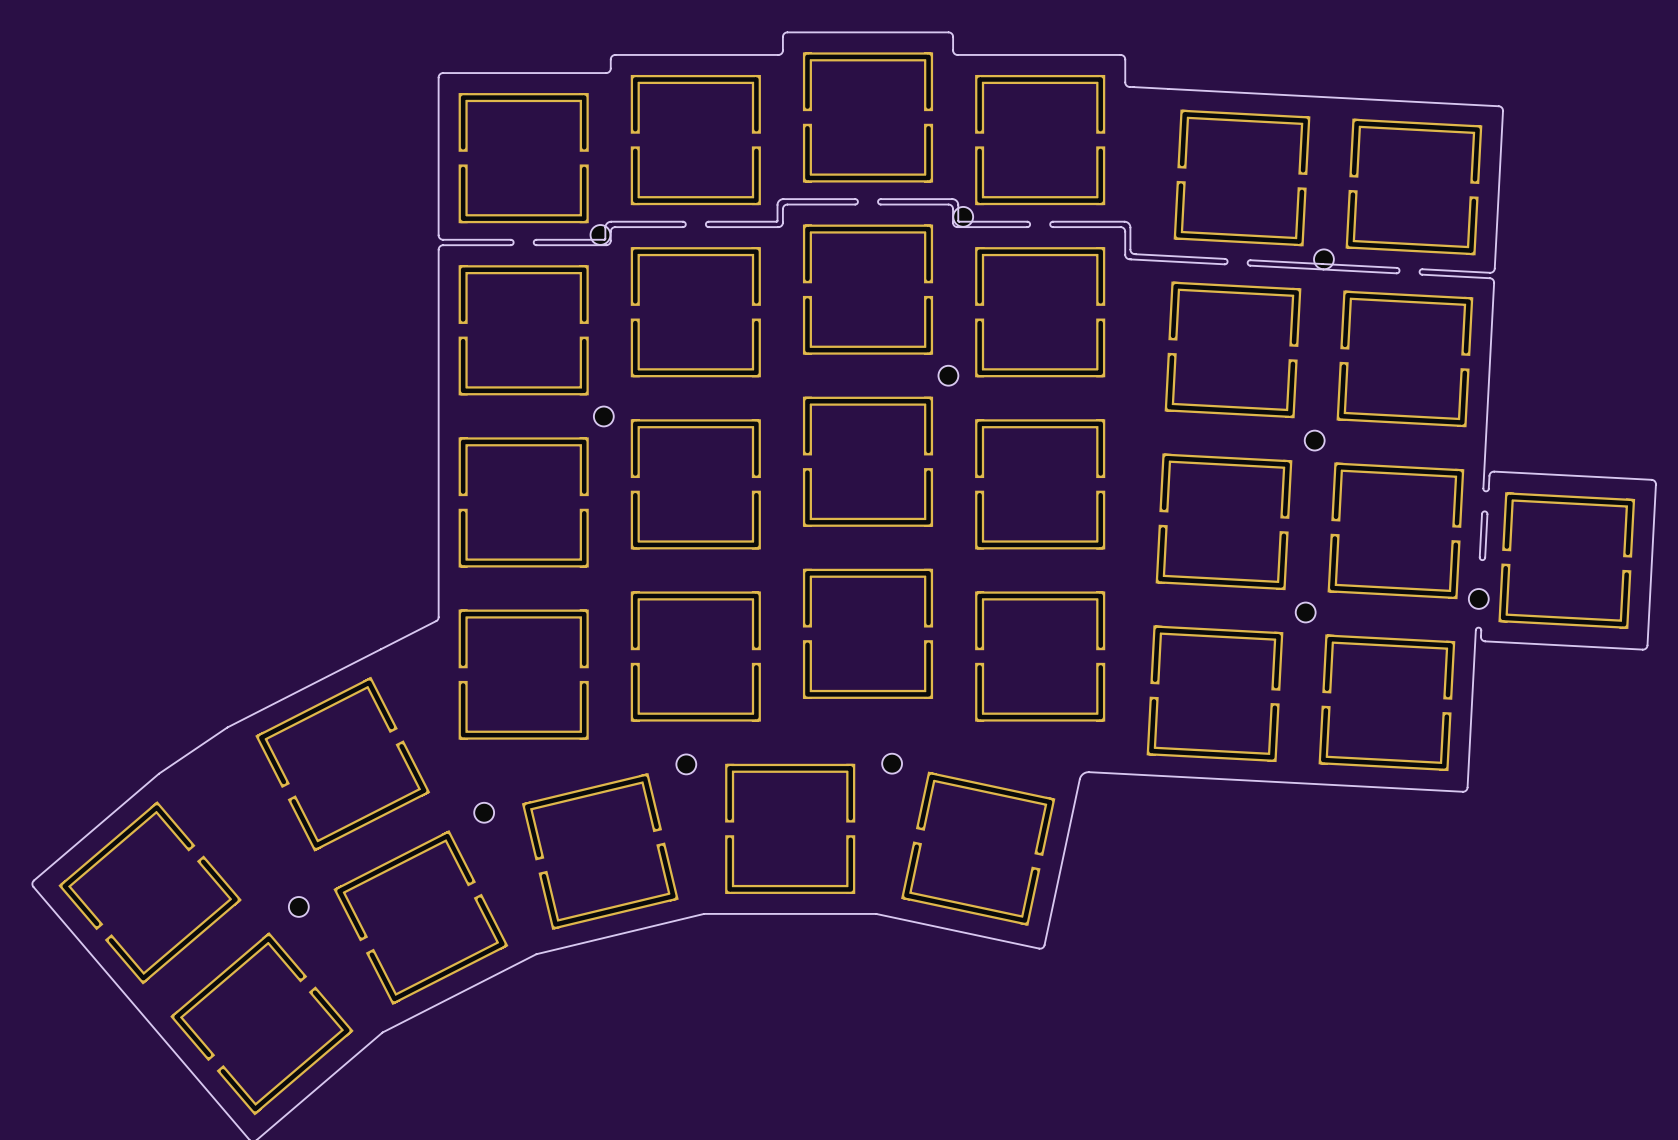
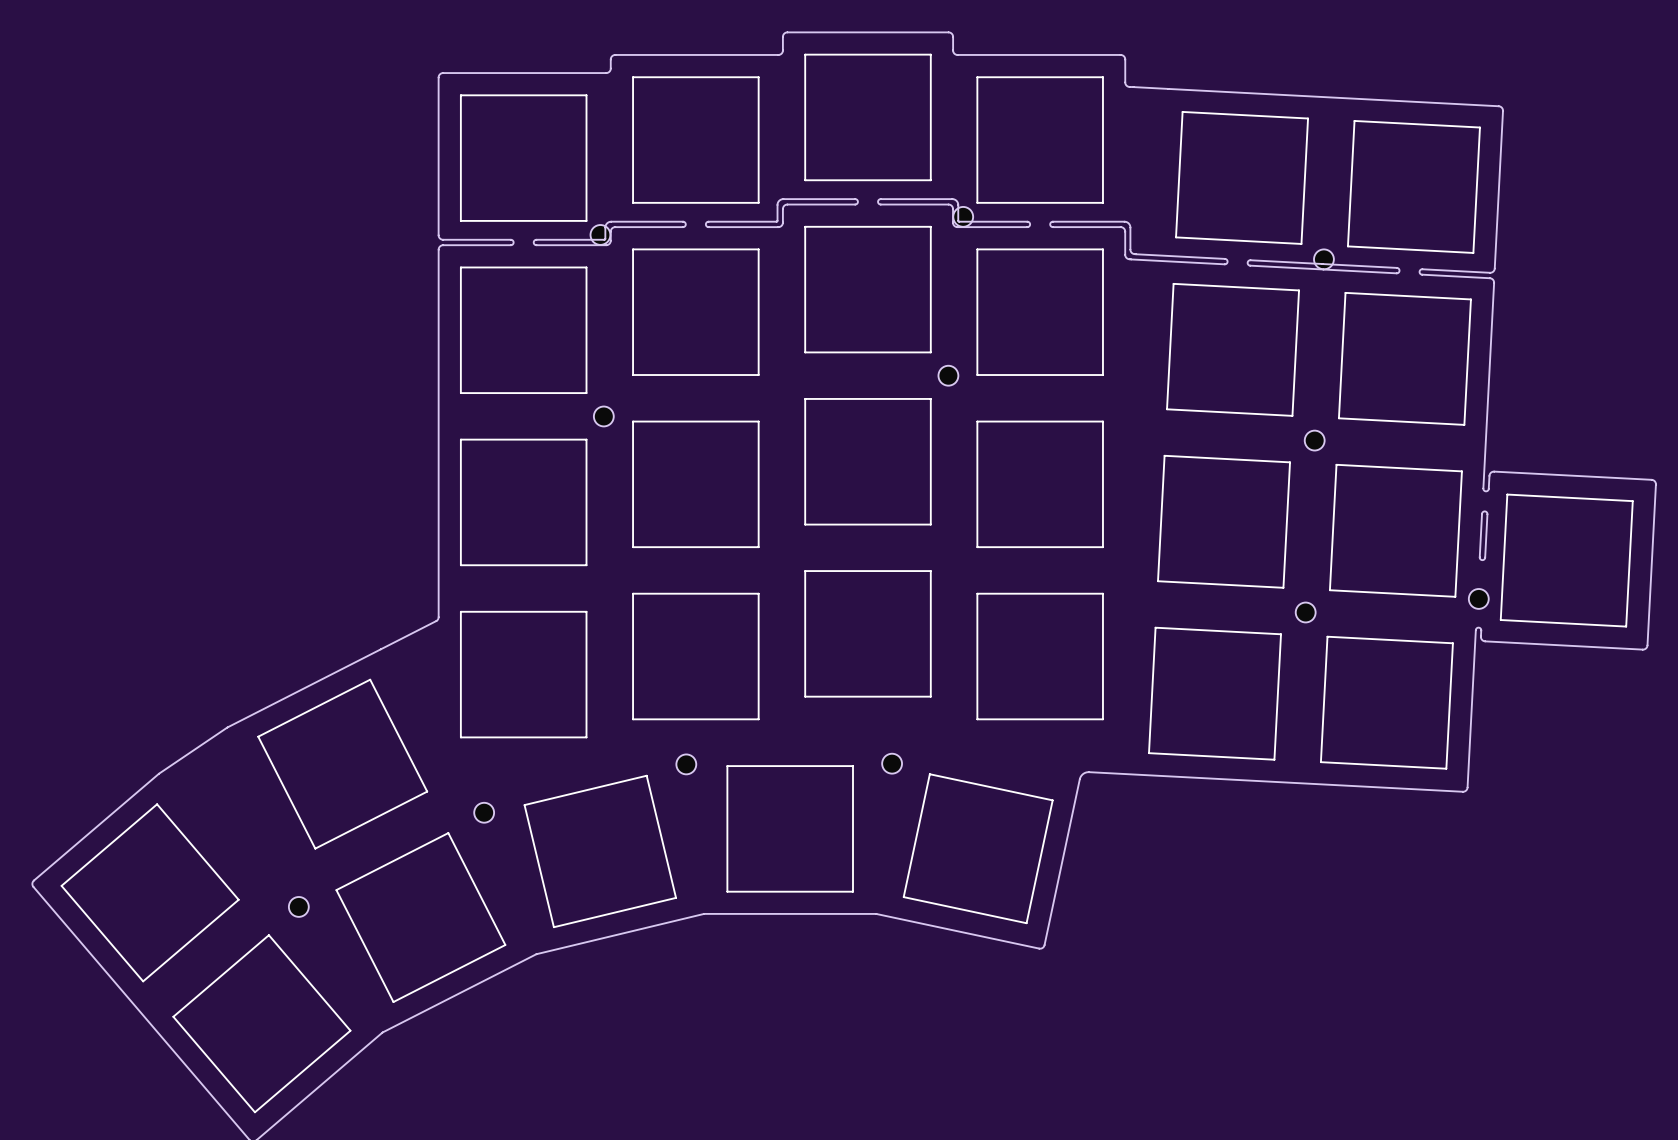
drawing: none -> [804, 54, 932, 181]
drawing: none -> [632, 76, 760, 204]
drawing: none -> [976, 76, 1104, 204]
drawing: none -> [460, 94, 588, 222]
drawing: none -> [1175, 111, 1309, 245]
part: (868, 117) -> none
drawing: none -> [1347, 120, 1481, 254]
part: (695, 140) -> none
part: (1040, 140) -> none
part: (523, 158) -> none
part: (1242, 177) -> none
part: (1413, 186) -> none
drawing: none -> [804, 226, 932, 353]
drawing: none -> [632, 248, 760, 376]
drawing: none -> [976, 248, 1104, 376]
drawing: none -> [460, 266, 588, 394]
drawing: none -> [1166, 283, 1300, 417]
part: (868, 289) -> none
drawing: none -> [1338, 292, 1472, 426]
part: (695, 312) -> none
part: (1040, 312) -> none
part: (523, 330) -> none
part: (1233, 349) -> none
part: (1404, 358) -> none
drawing: none -> [804, 398, 932, 526]
drawing: none -> [632, 421, 760, 548]
drawing: none -> [976, 421, 1104, 548]
drawing: none -> [460, 439, 588, 566]
drawing: none -> [1157, 455, 1291, 589]
part: (868, 461) -> none
drawing: none -> [1329, 464, 1463, 598]
part: (695, 484) -> none
part: (1040, 484) -> none
drawing: none -> [1500, 494, 1634, 628]
part: (523, 502) -> none
part: (1224, 521) -> none
part: (1395, 530) -> none
part: (1566, 560) -> none
drawing: none -> [804, 570, 932, 698]
drawing: none -> [632, 593, 760, 720]
drawing: none -> [976, 593, 1104, 720]
drawing: none -> [460, 611, 588, 738]
drawing: none -> [1148, 627, 1282, 761]
part: (868, 633) -> none
drawing: none -> [1320, 636, 1454, 770]
part: (695, 656) -> none
part: (1040, 656) -> none
part: (523, 674) -> none
drawing: none -> [61, 679, 506, 1113]
part: (1215, 693) -> none
part: (1386, 702) -> none
part: (342, 764) -> none
drawing: none -> [726, 765, 854, 893]
drawing: none -> [903, 773, 1054, 924]
drawing: none -> [524, 775, 677, 928]
part: (790, 828) -> none
part: (978, 848) -> none
part: (600, 851) -> none
part: (150, 892) -> none
part: (420, 917) -> none
part: (261, 1023) -> none

